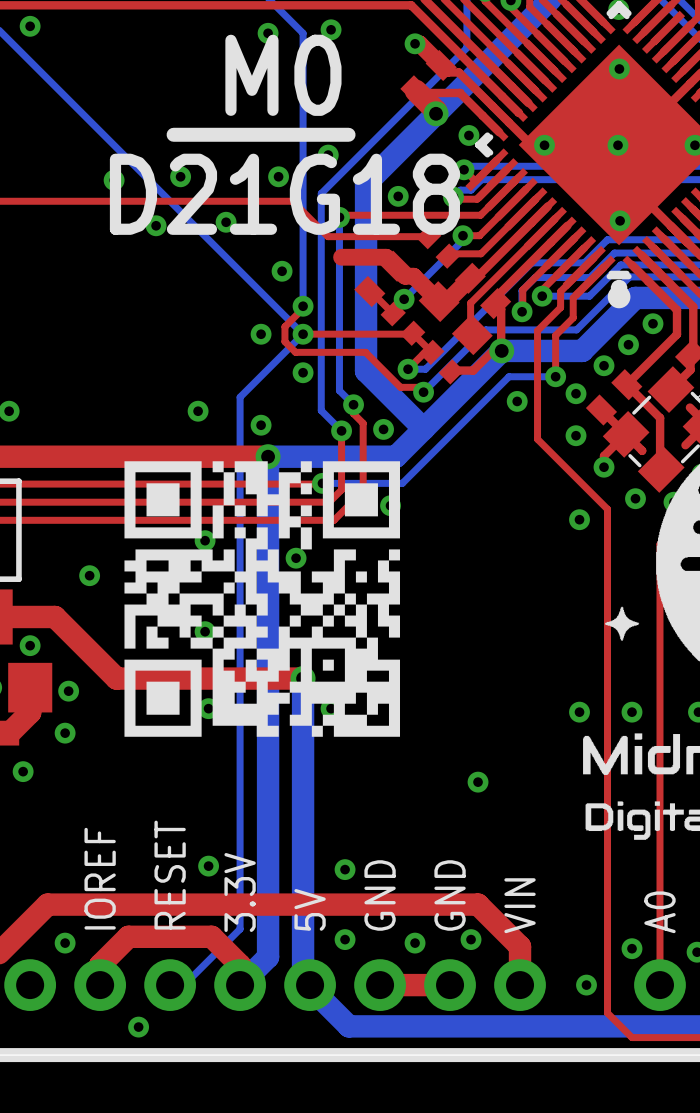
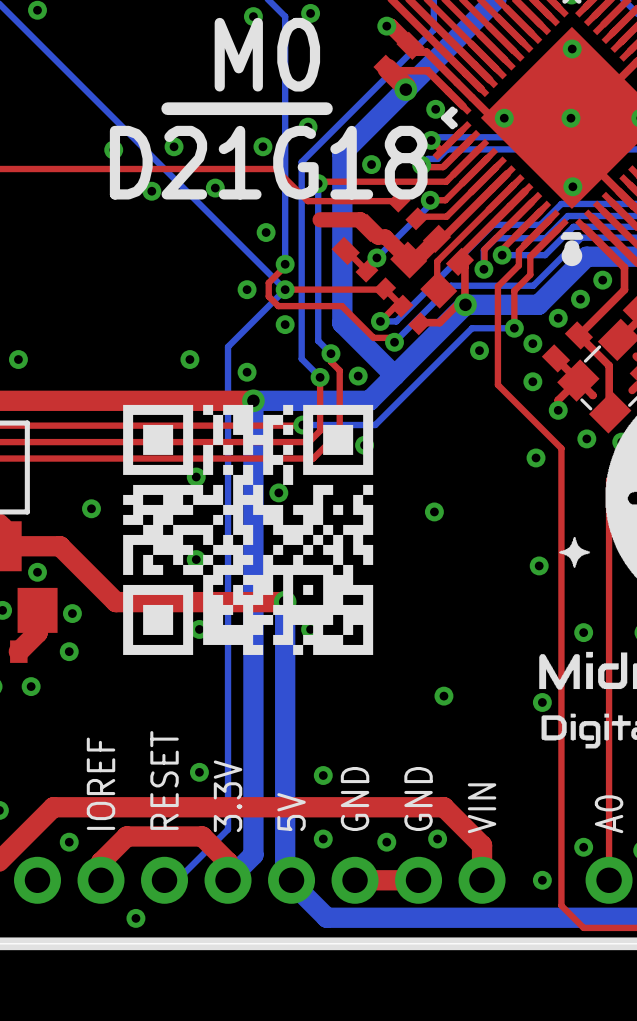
via: none -> (434, 511)
via: none -> (539, 565)
via: (579, 712) -> none
via: none -> (542, 702)

